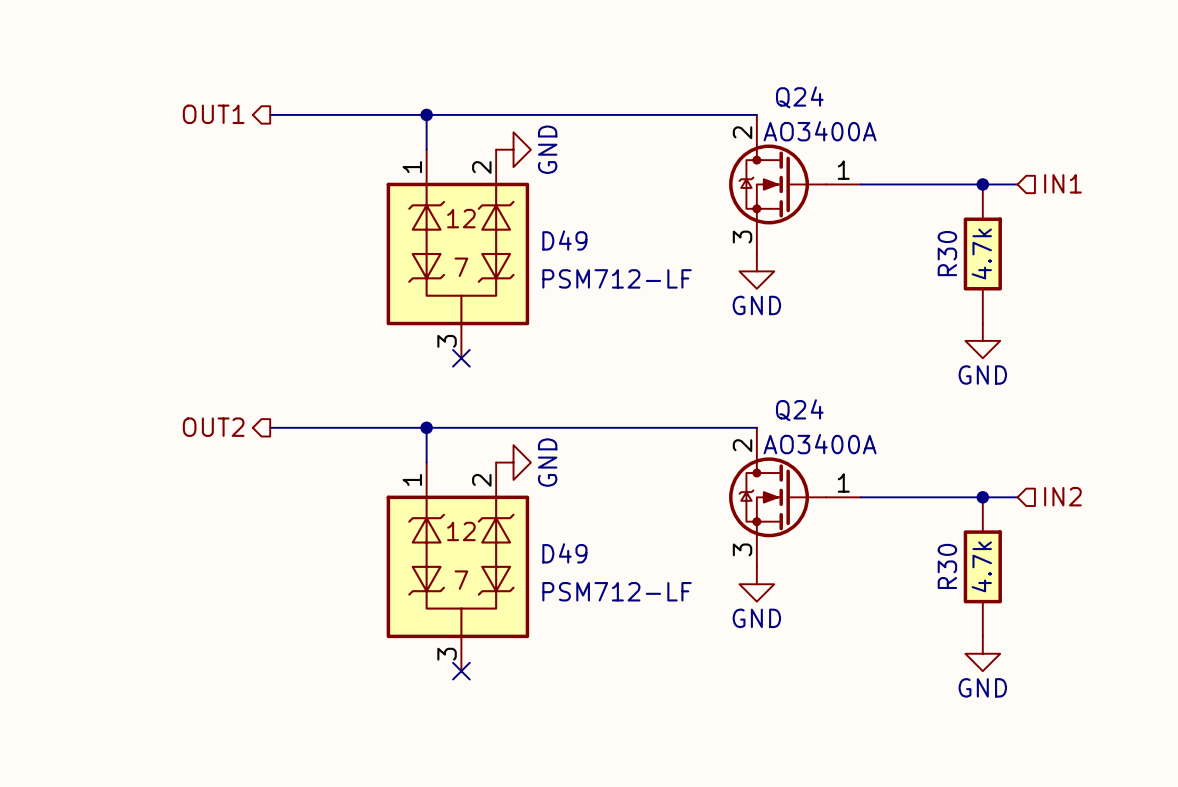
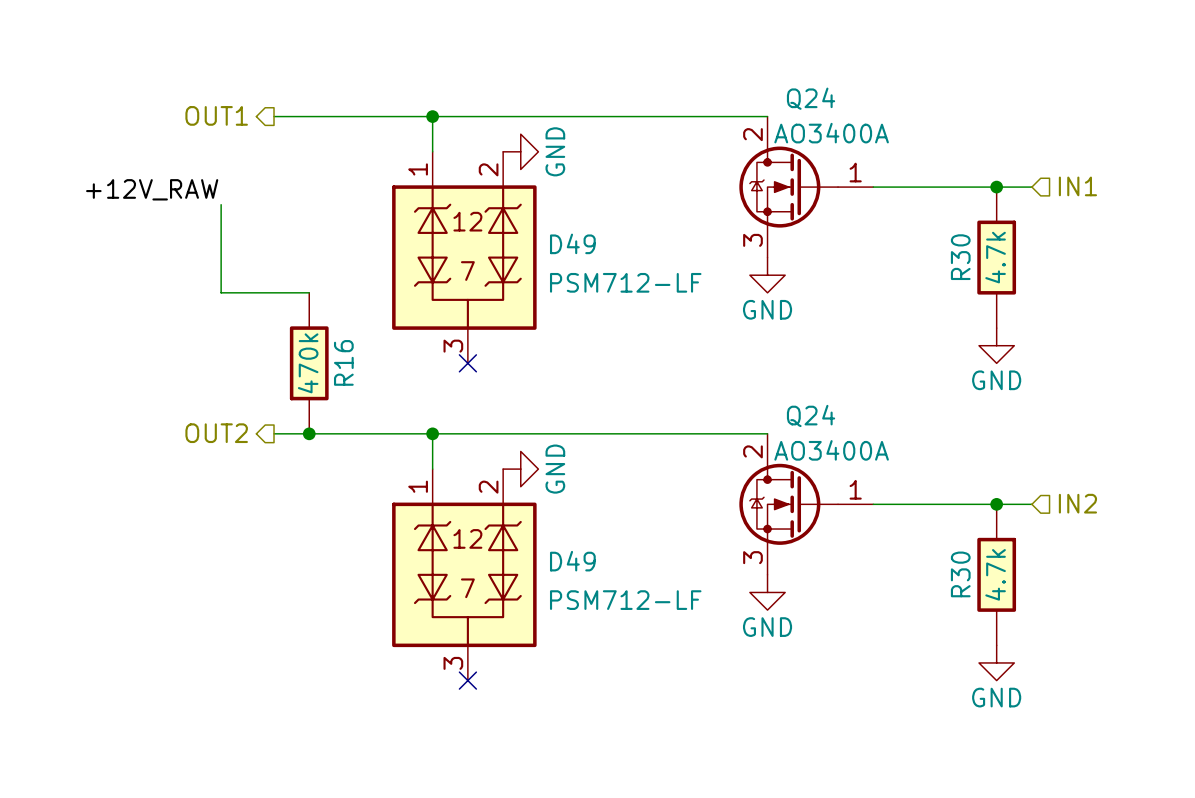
label: none -> +12V_RAW (152, 189)
wire: none -> (221, 204) (221, 292) (309, 292)
R16: none -> 470k (309, 363)
junction: none -> (309, 433)

